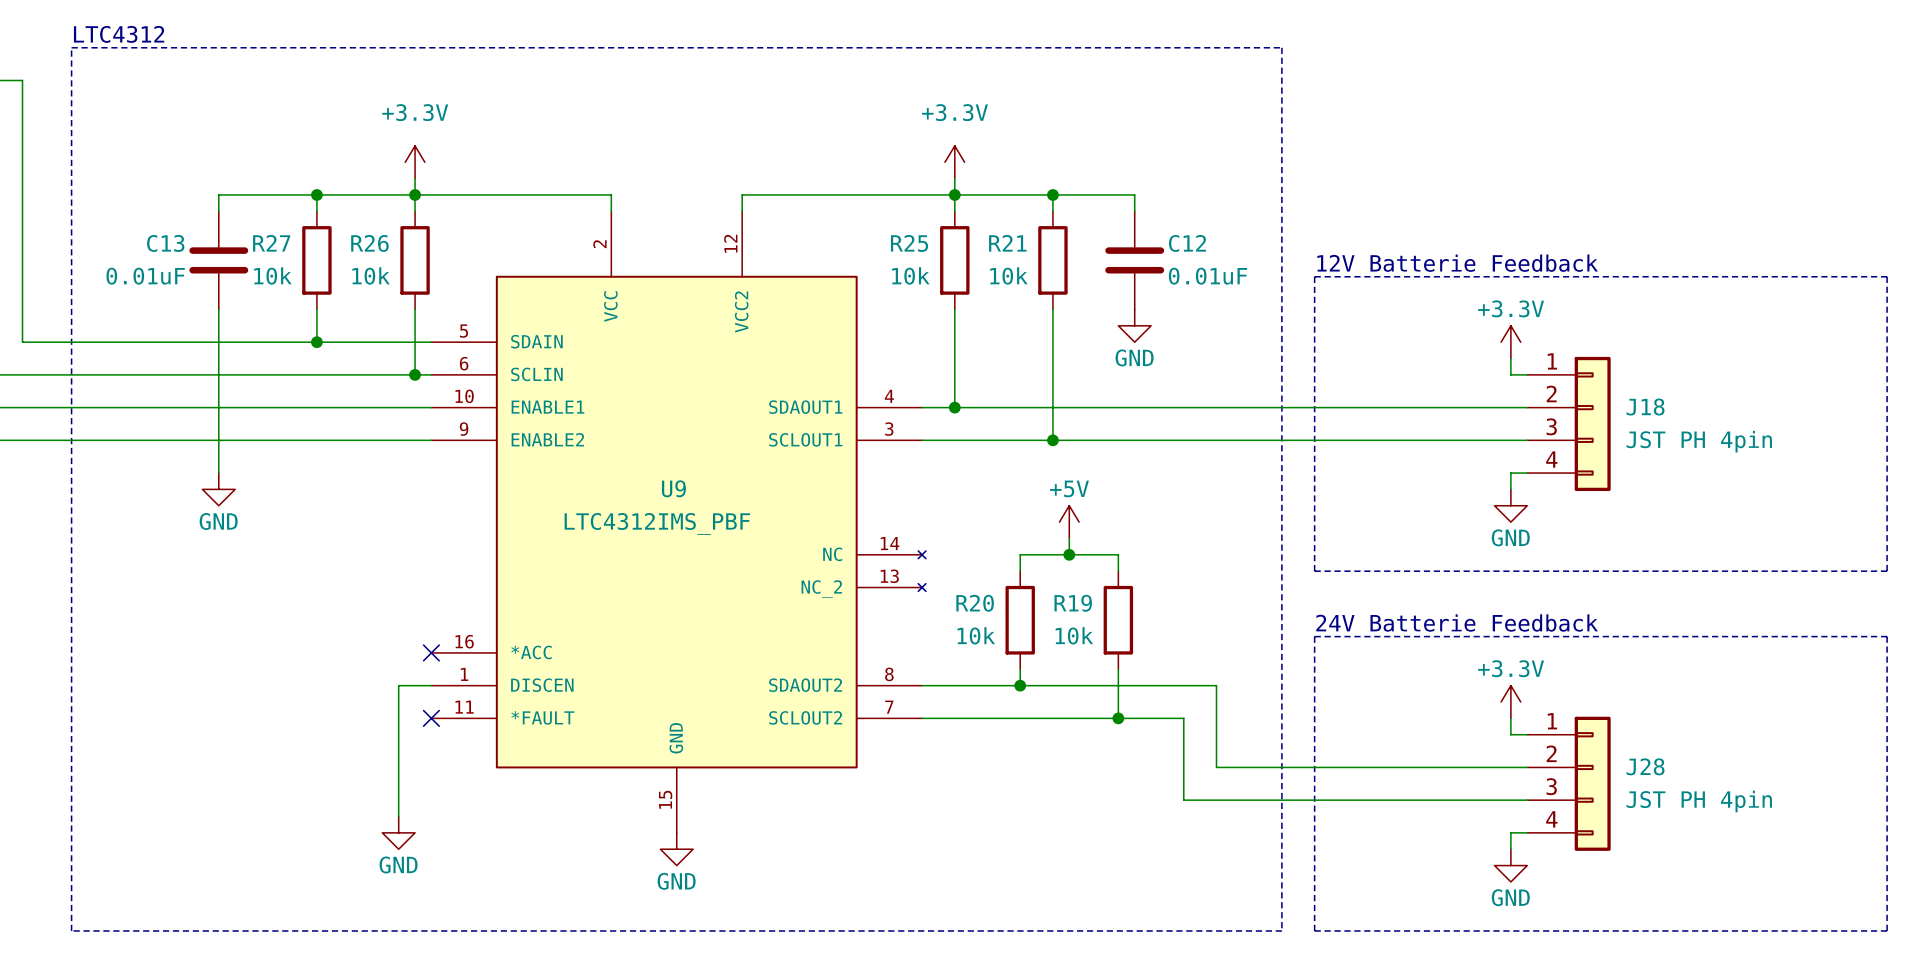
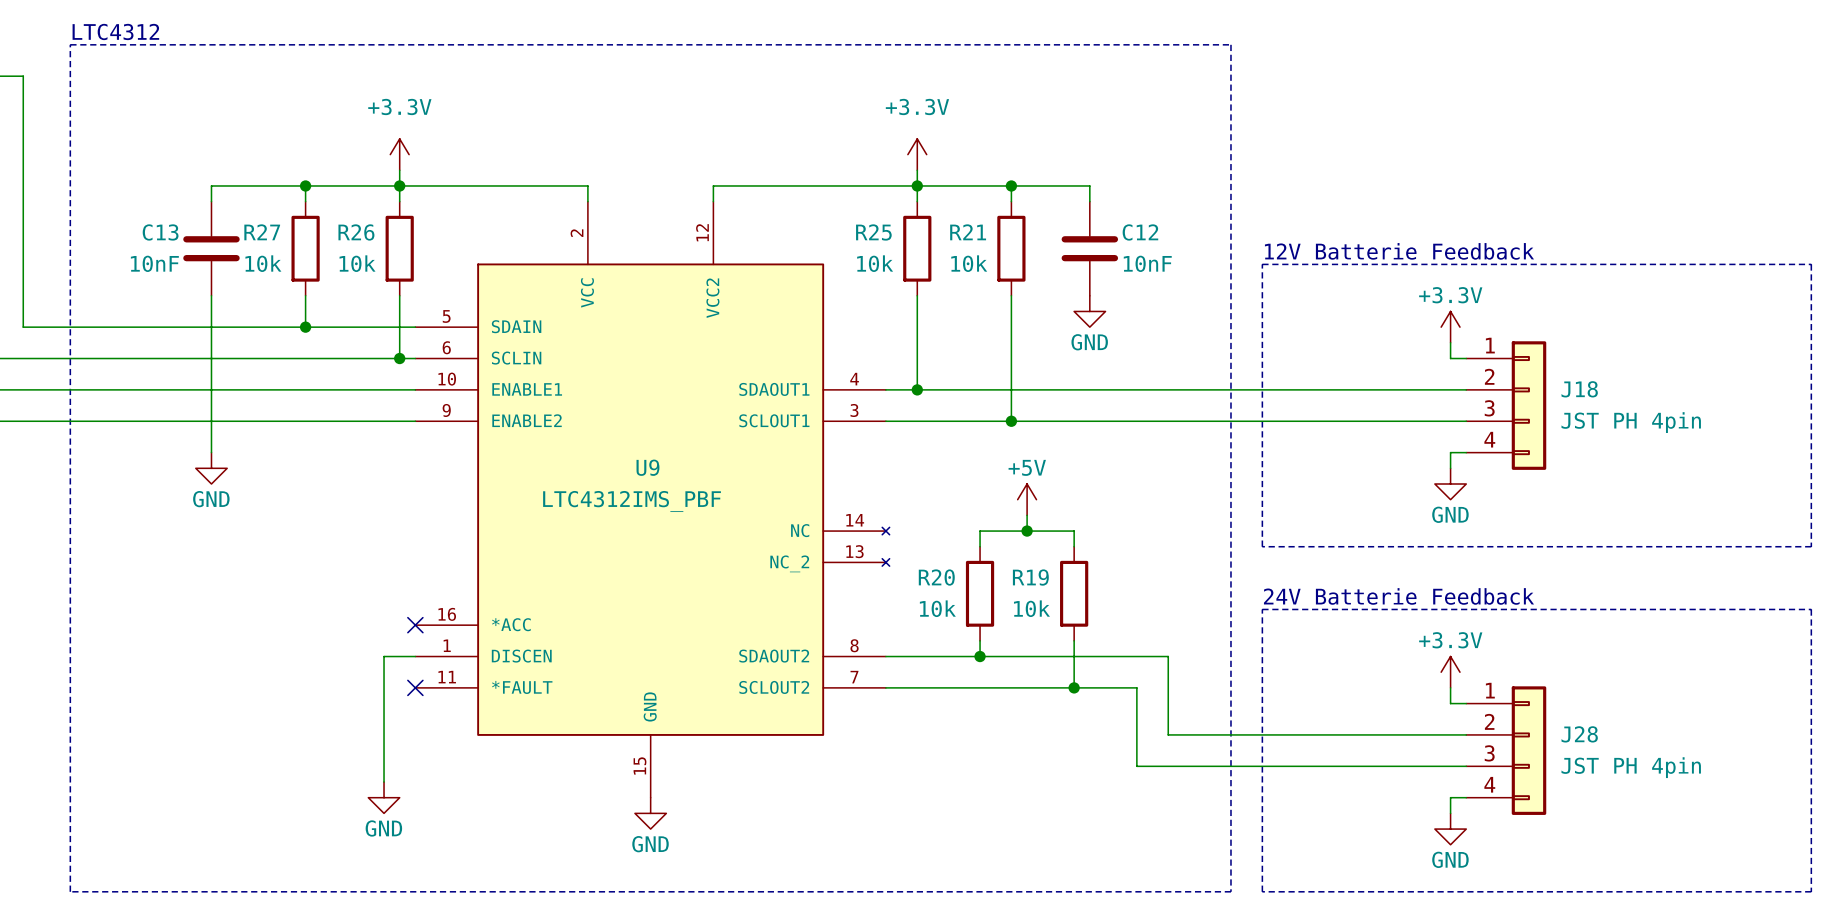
C13 value: 0.01uF (145, 276) -> 10nF (154, 263)
C12 value: 0.01uF (1208, 276) -> 10nF (1147, 263)

